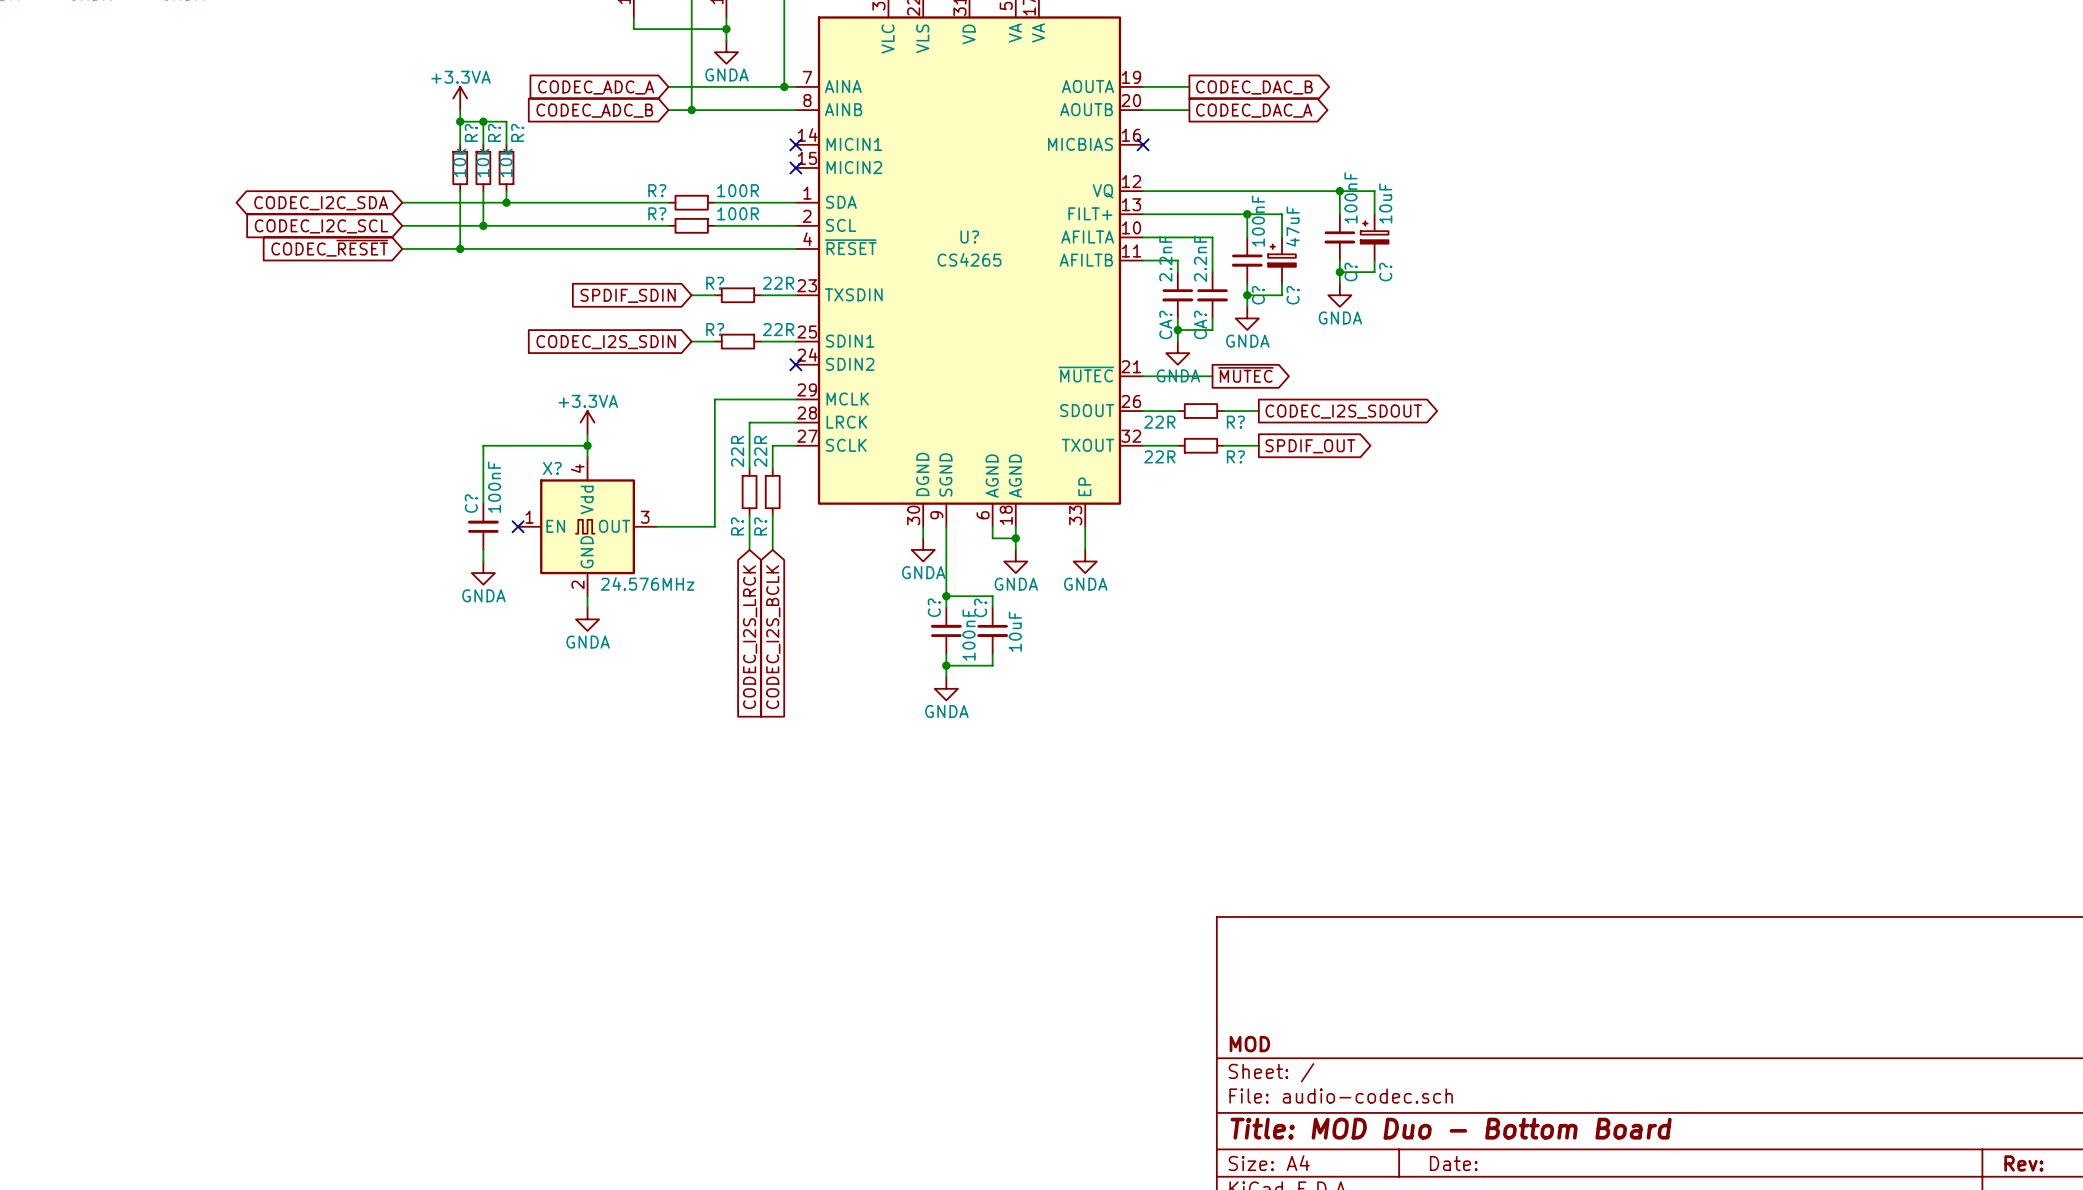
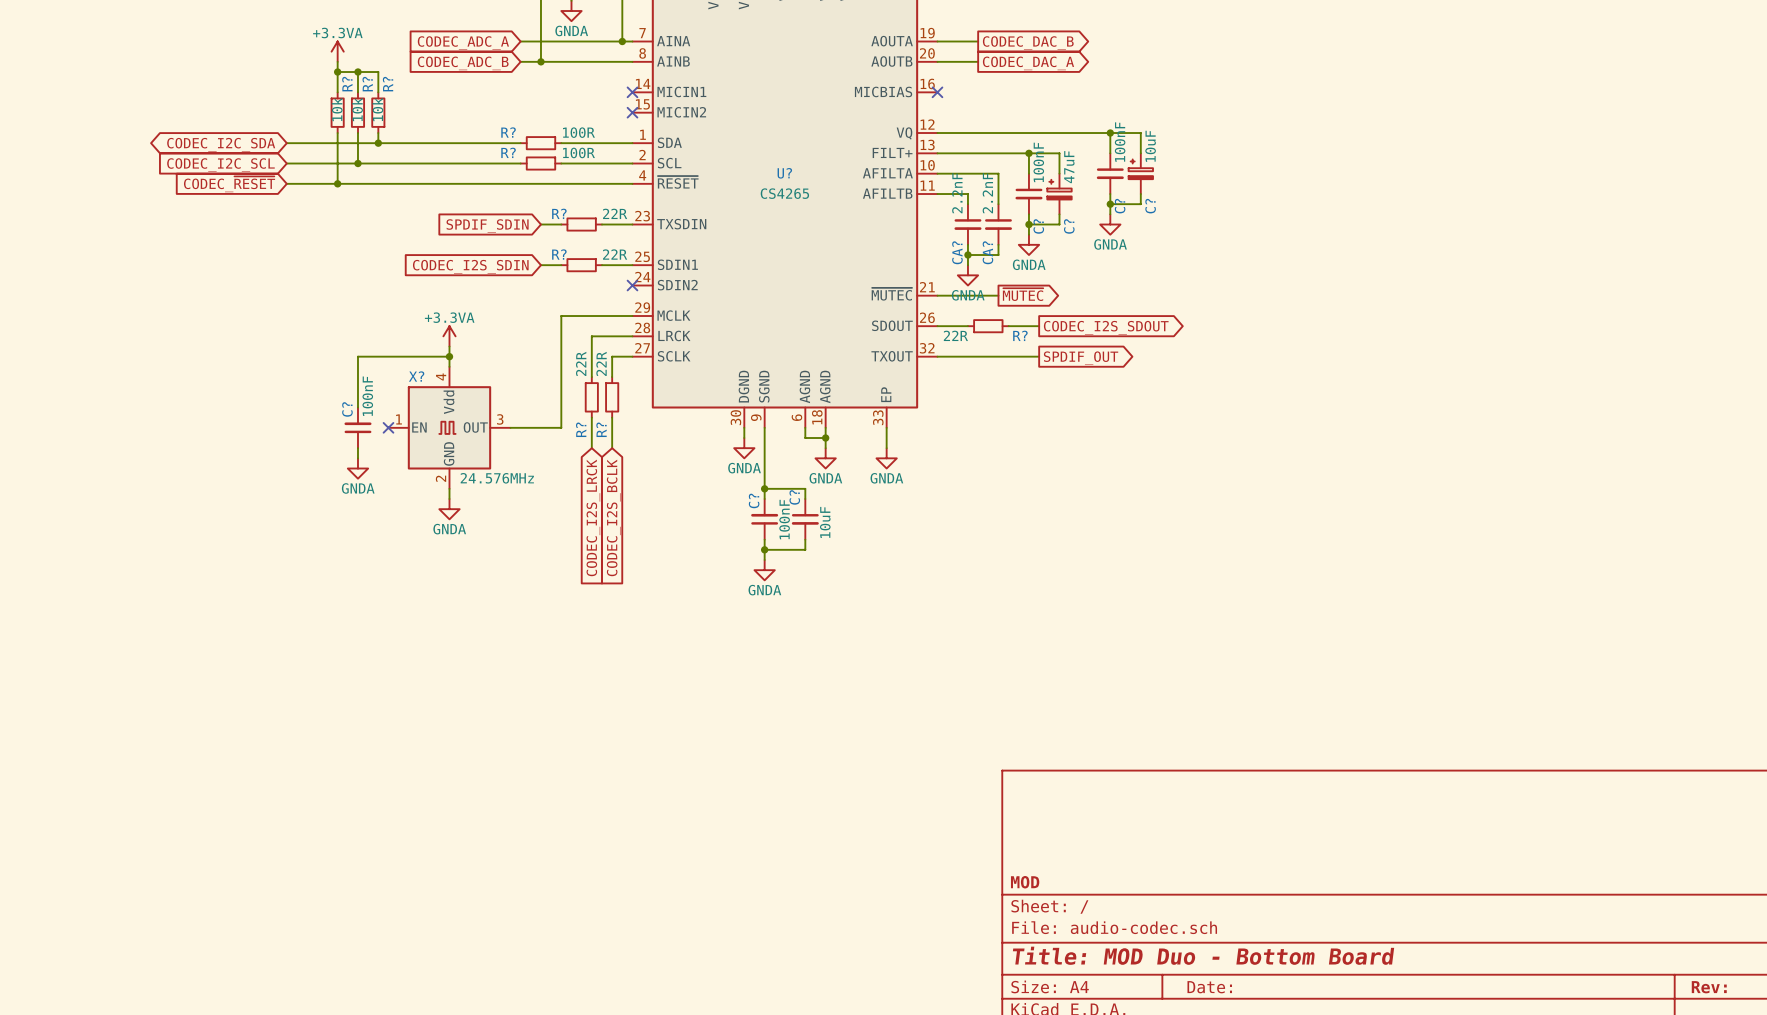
wire: none -> (967, 356) (1008, 356)
R?: 22R (1200, 445) -> none

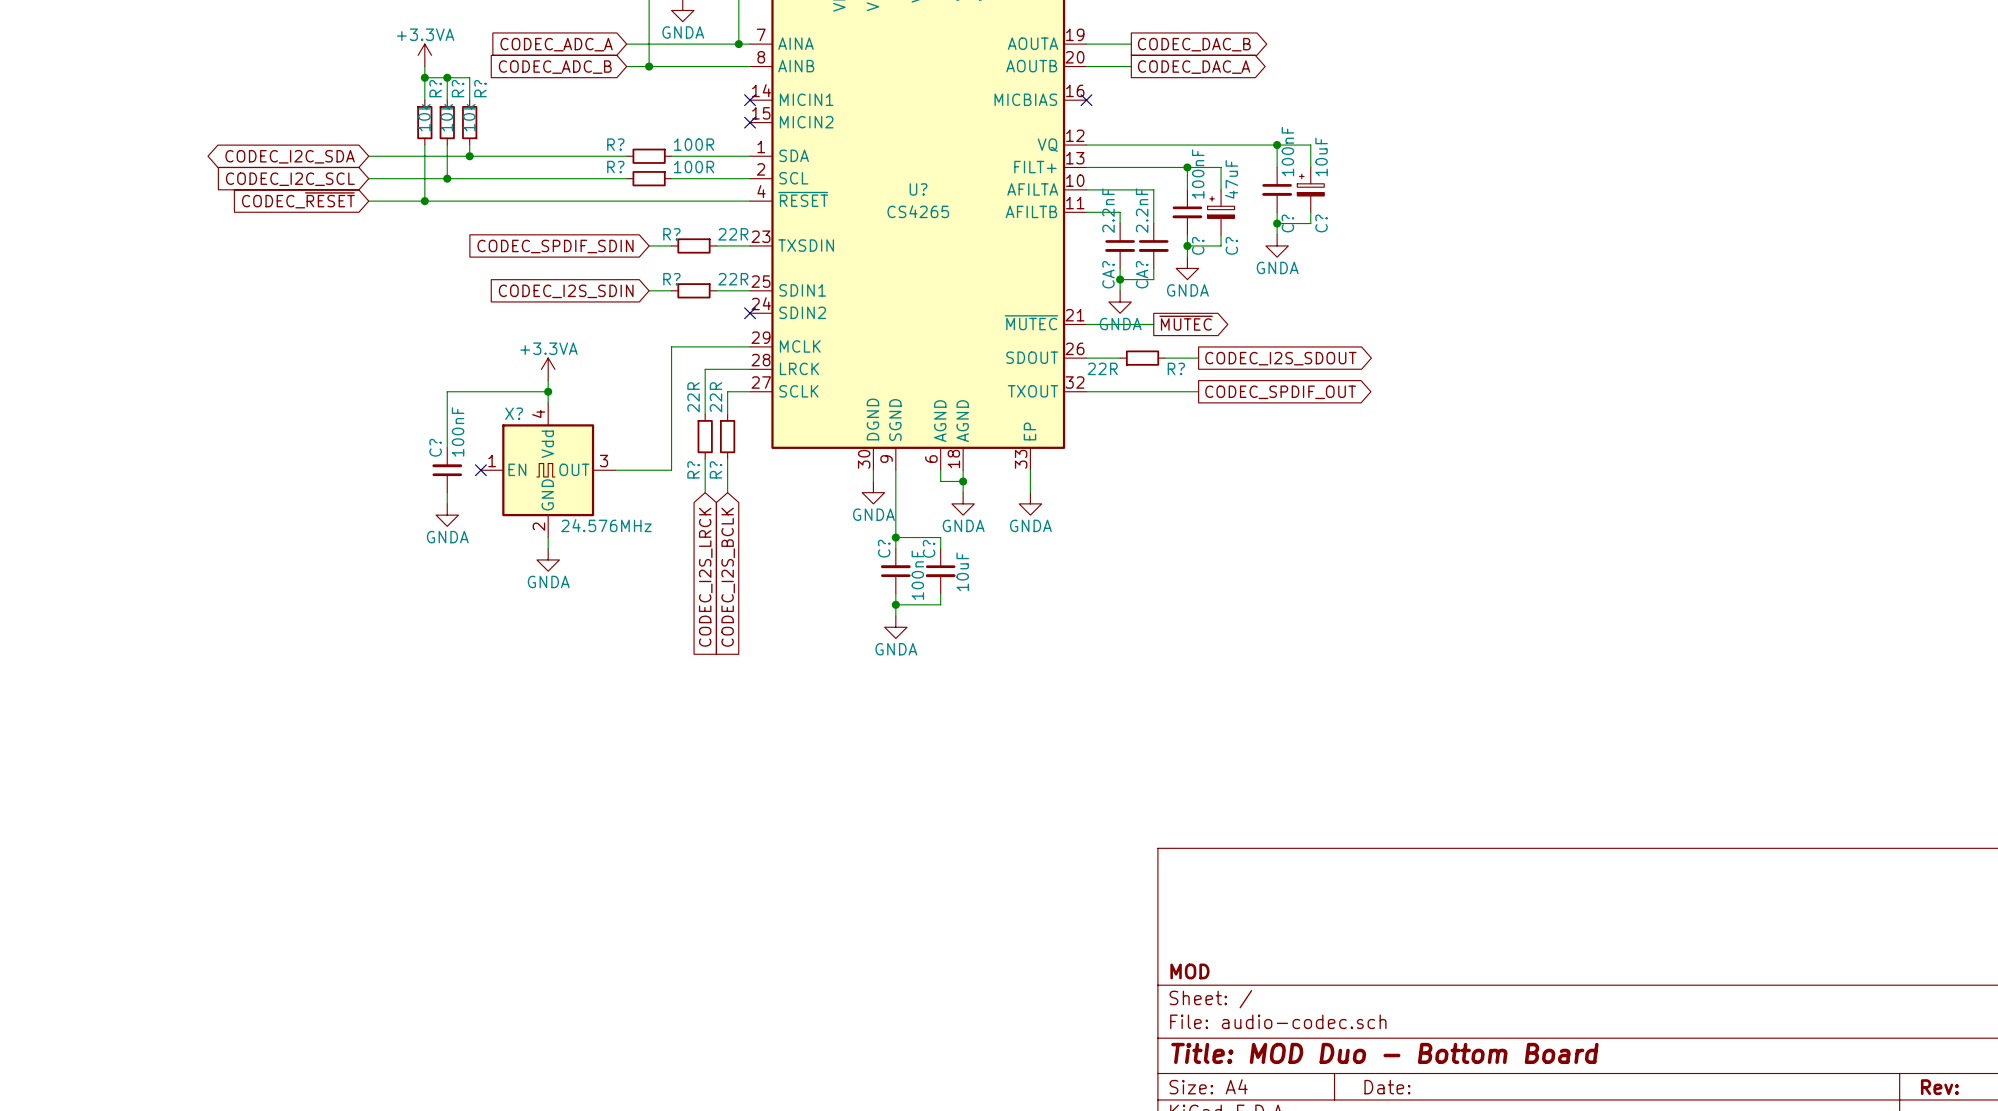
global label: SPDIF_SDIN (487, 226) -> CODEC_SPDIF_SDIN (555, 246)
global label: SPDIF_OUT (1081, 358) -> CODEC_SPDIF_OUT (1280, 392)

